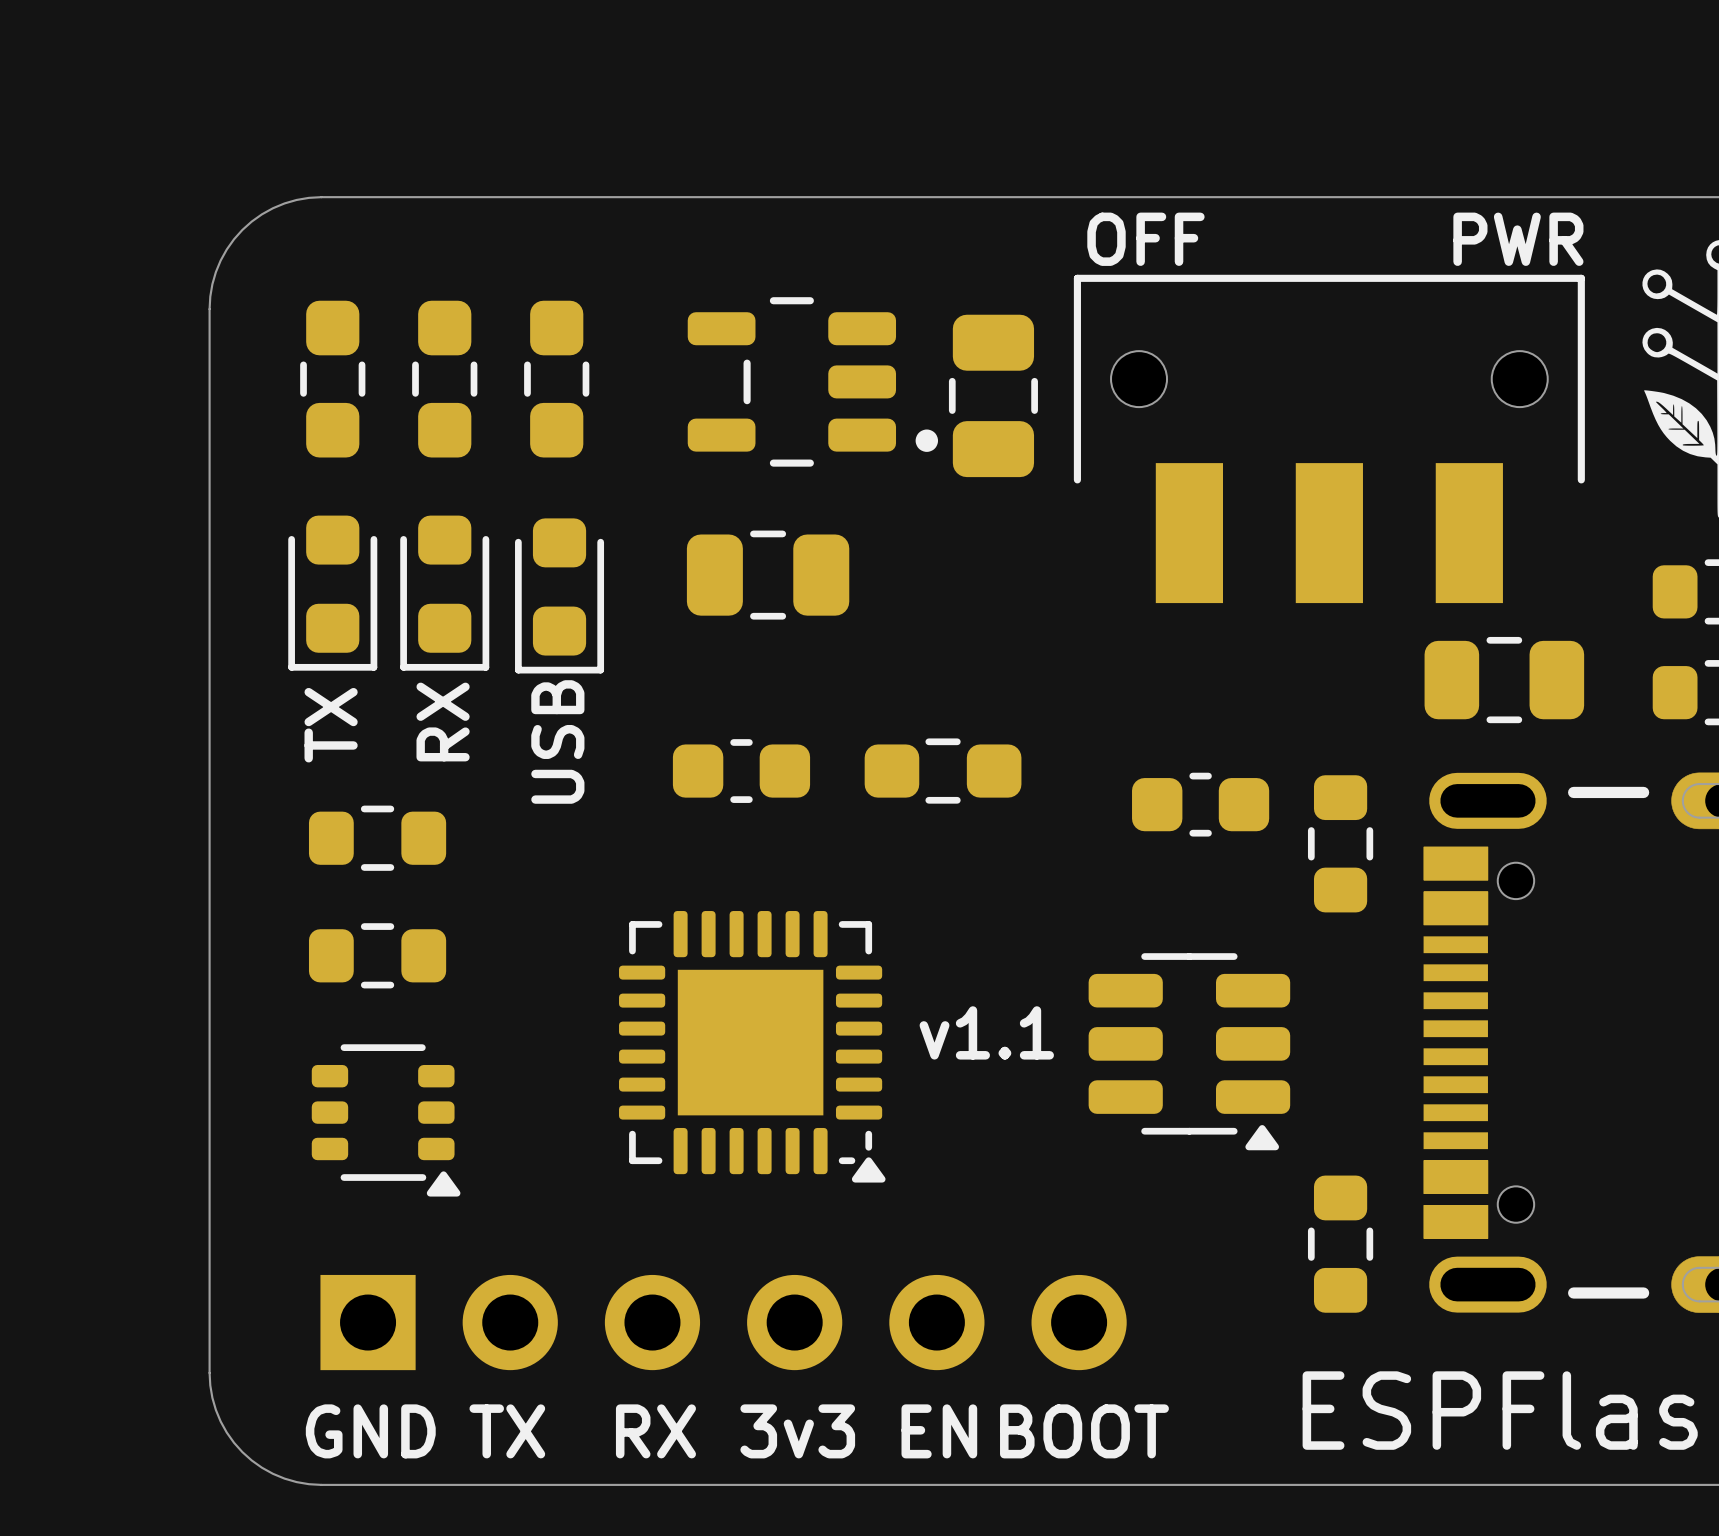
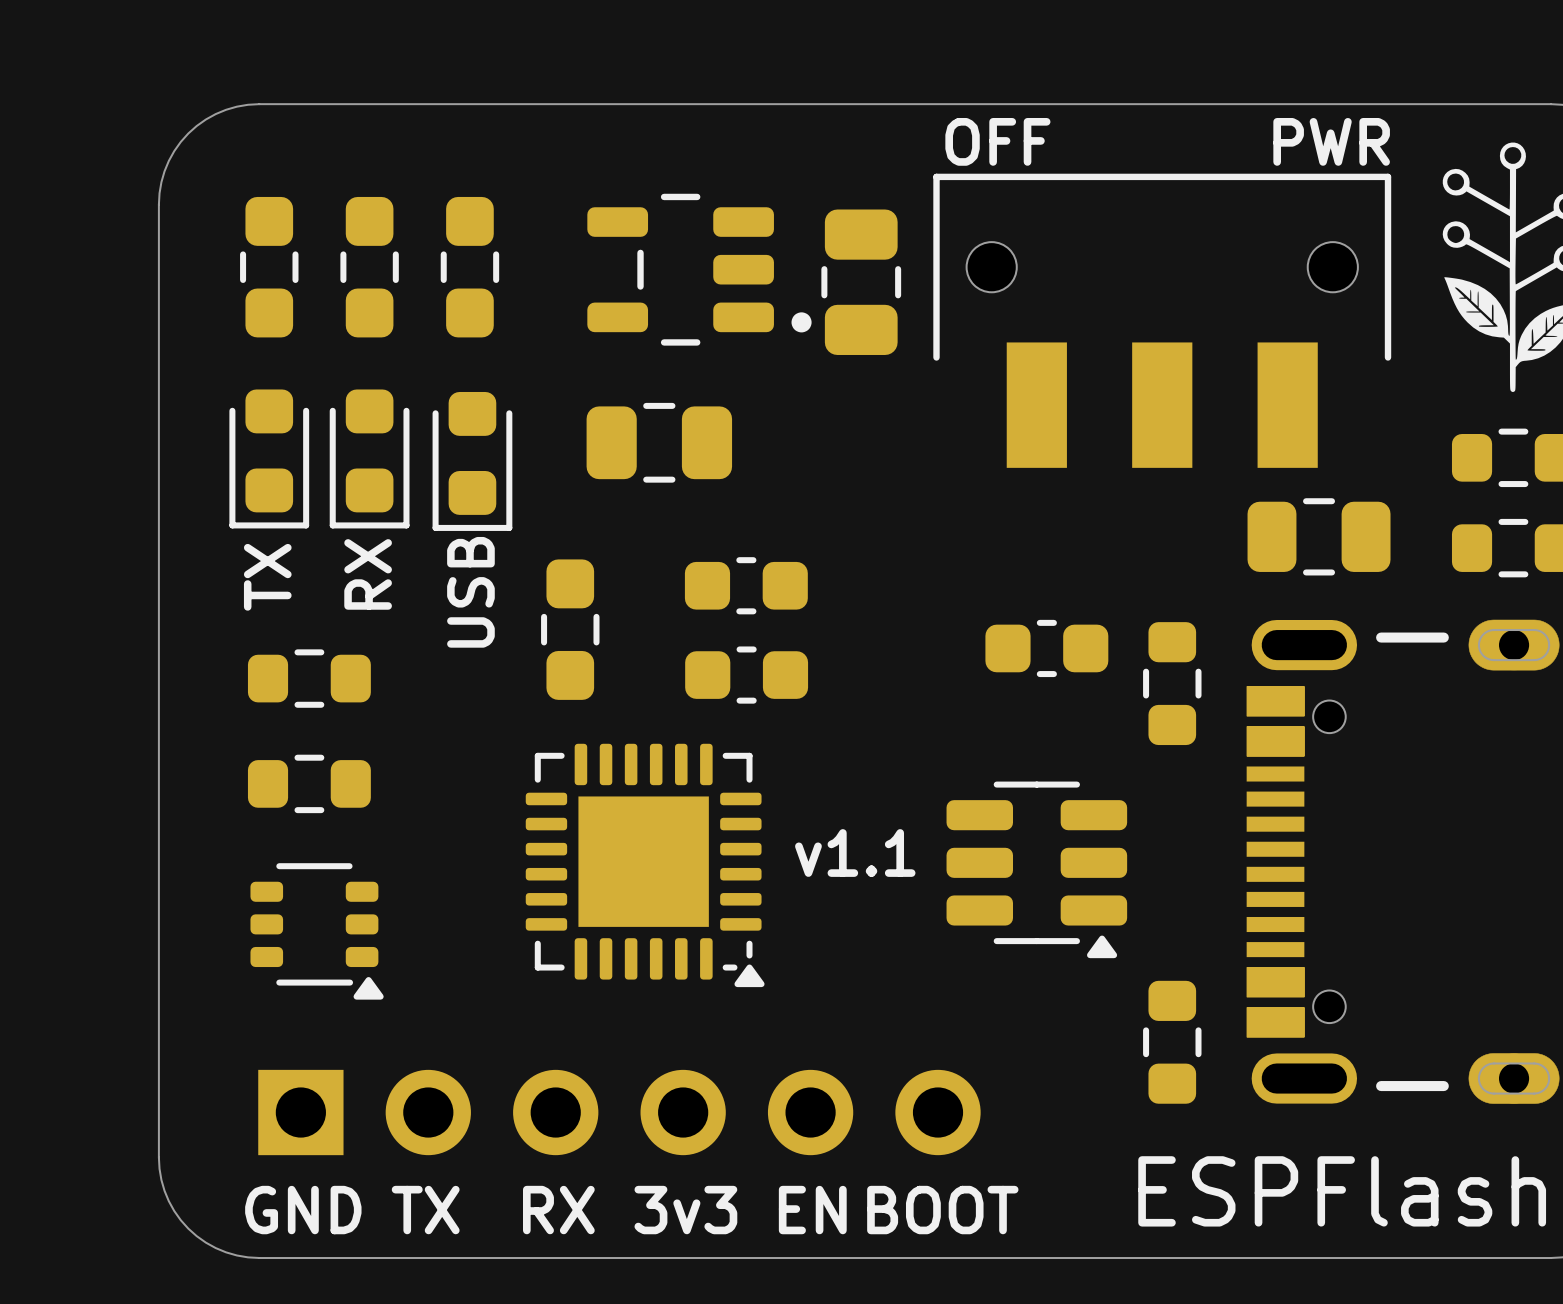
part: none -> (746, 585)
part: (741, 771) -> none
part rotation: 0° (943, 771) -> 90° clockwise (570, 629)
part position: (943, 771) -> (570, 629)
part: none -> (746, 675)

